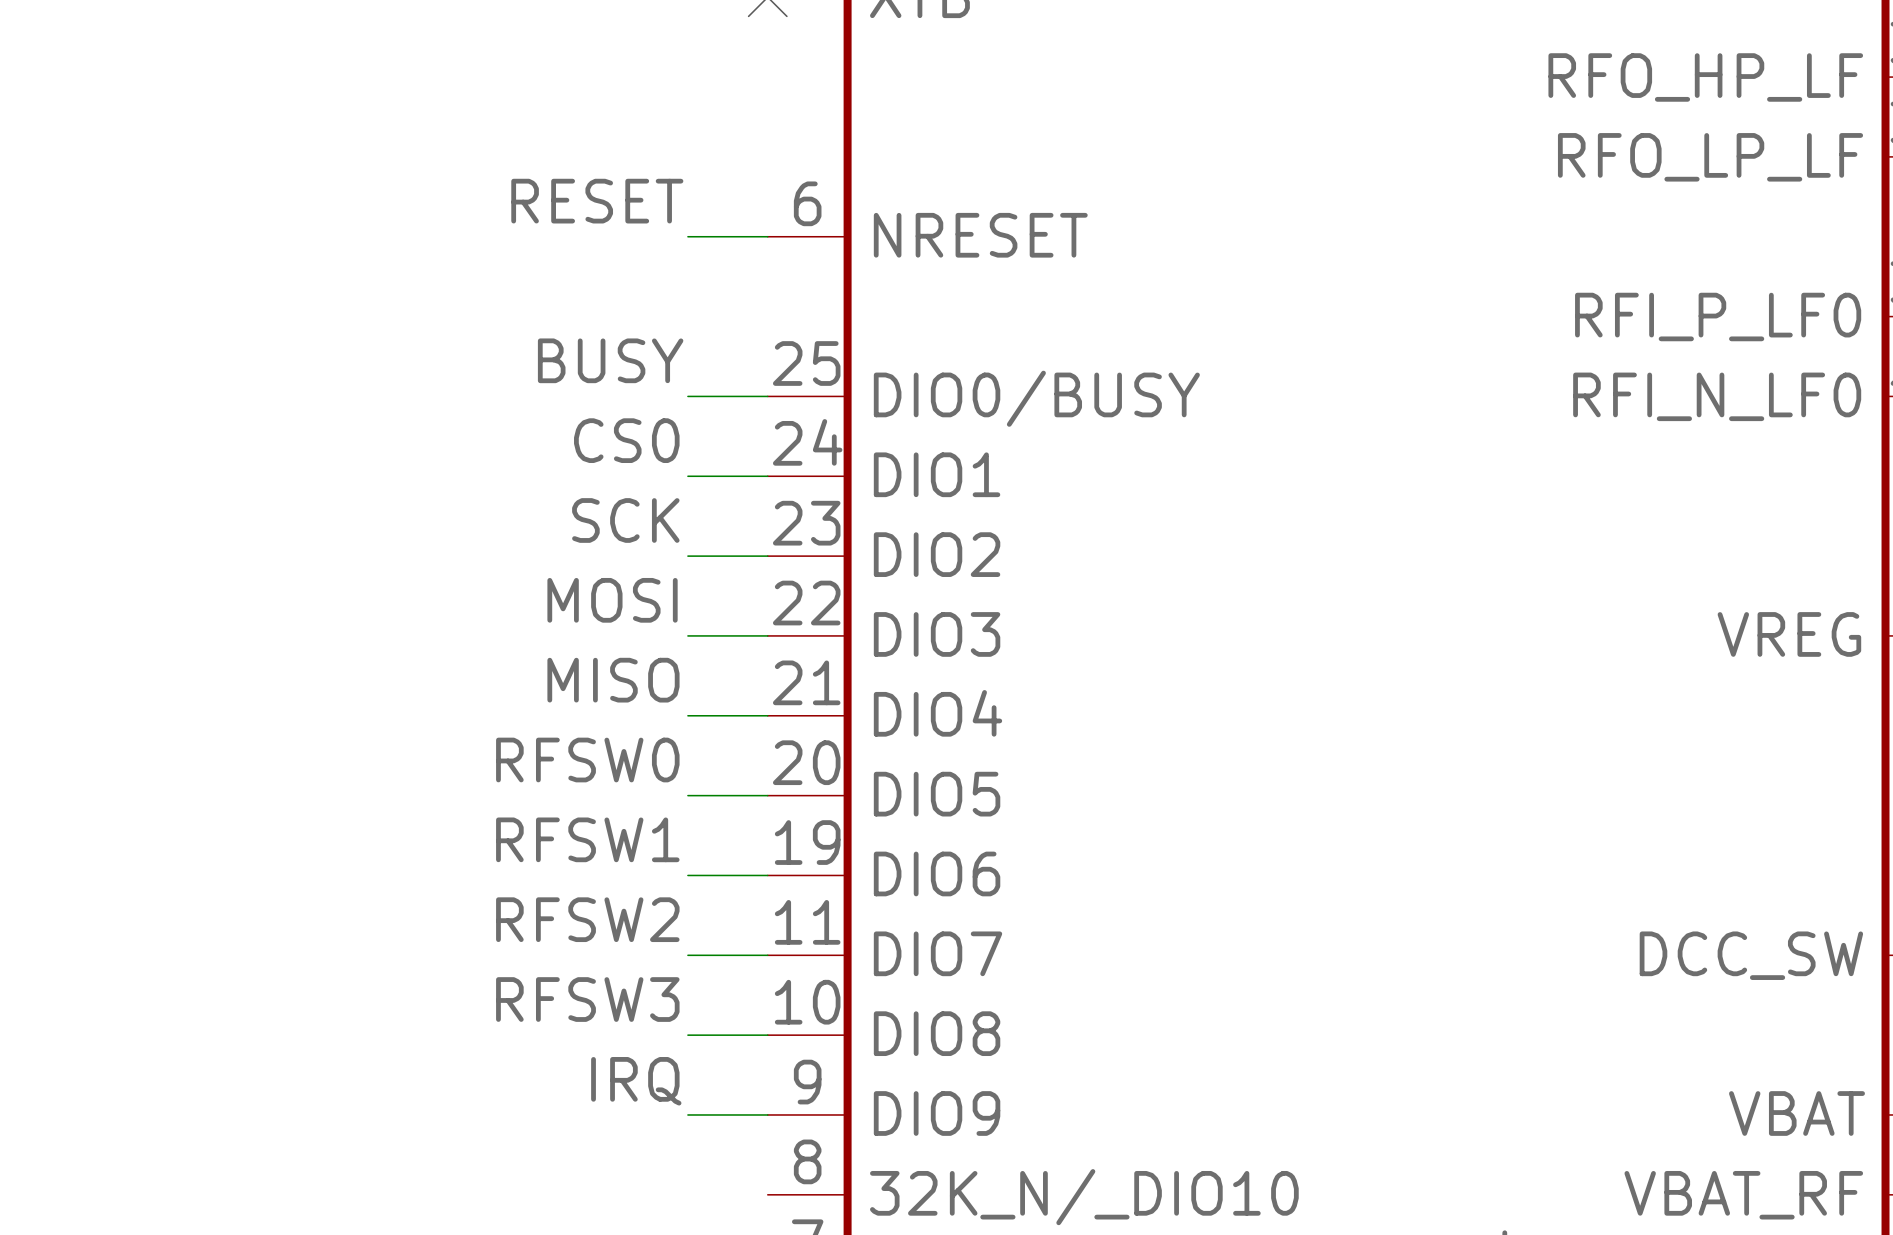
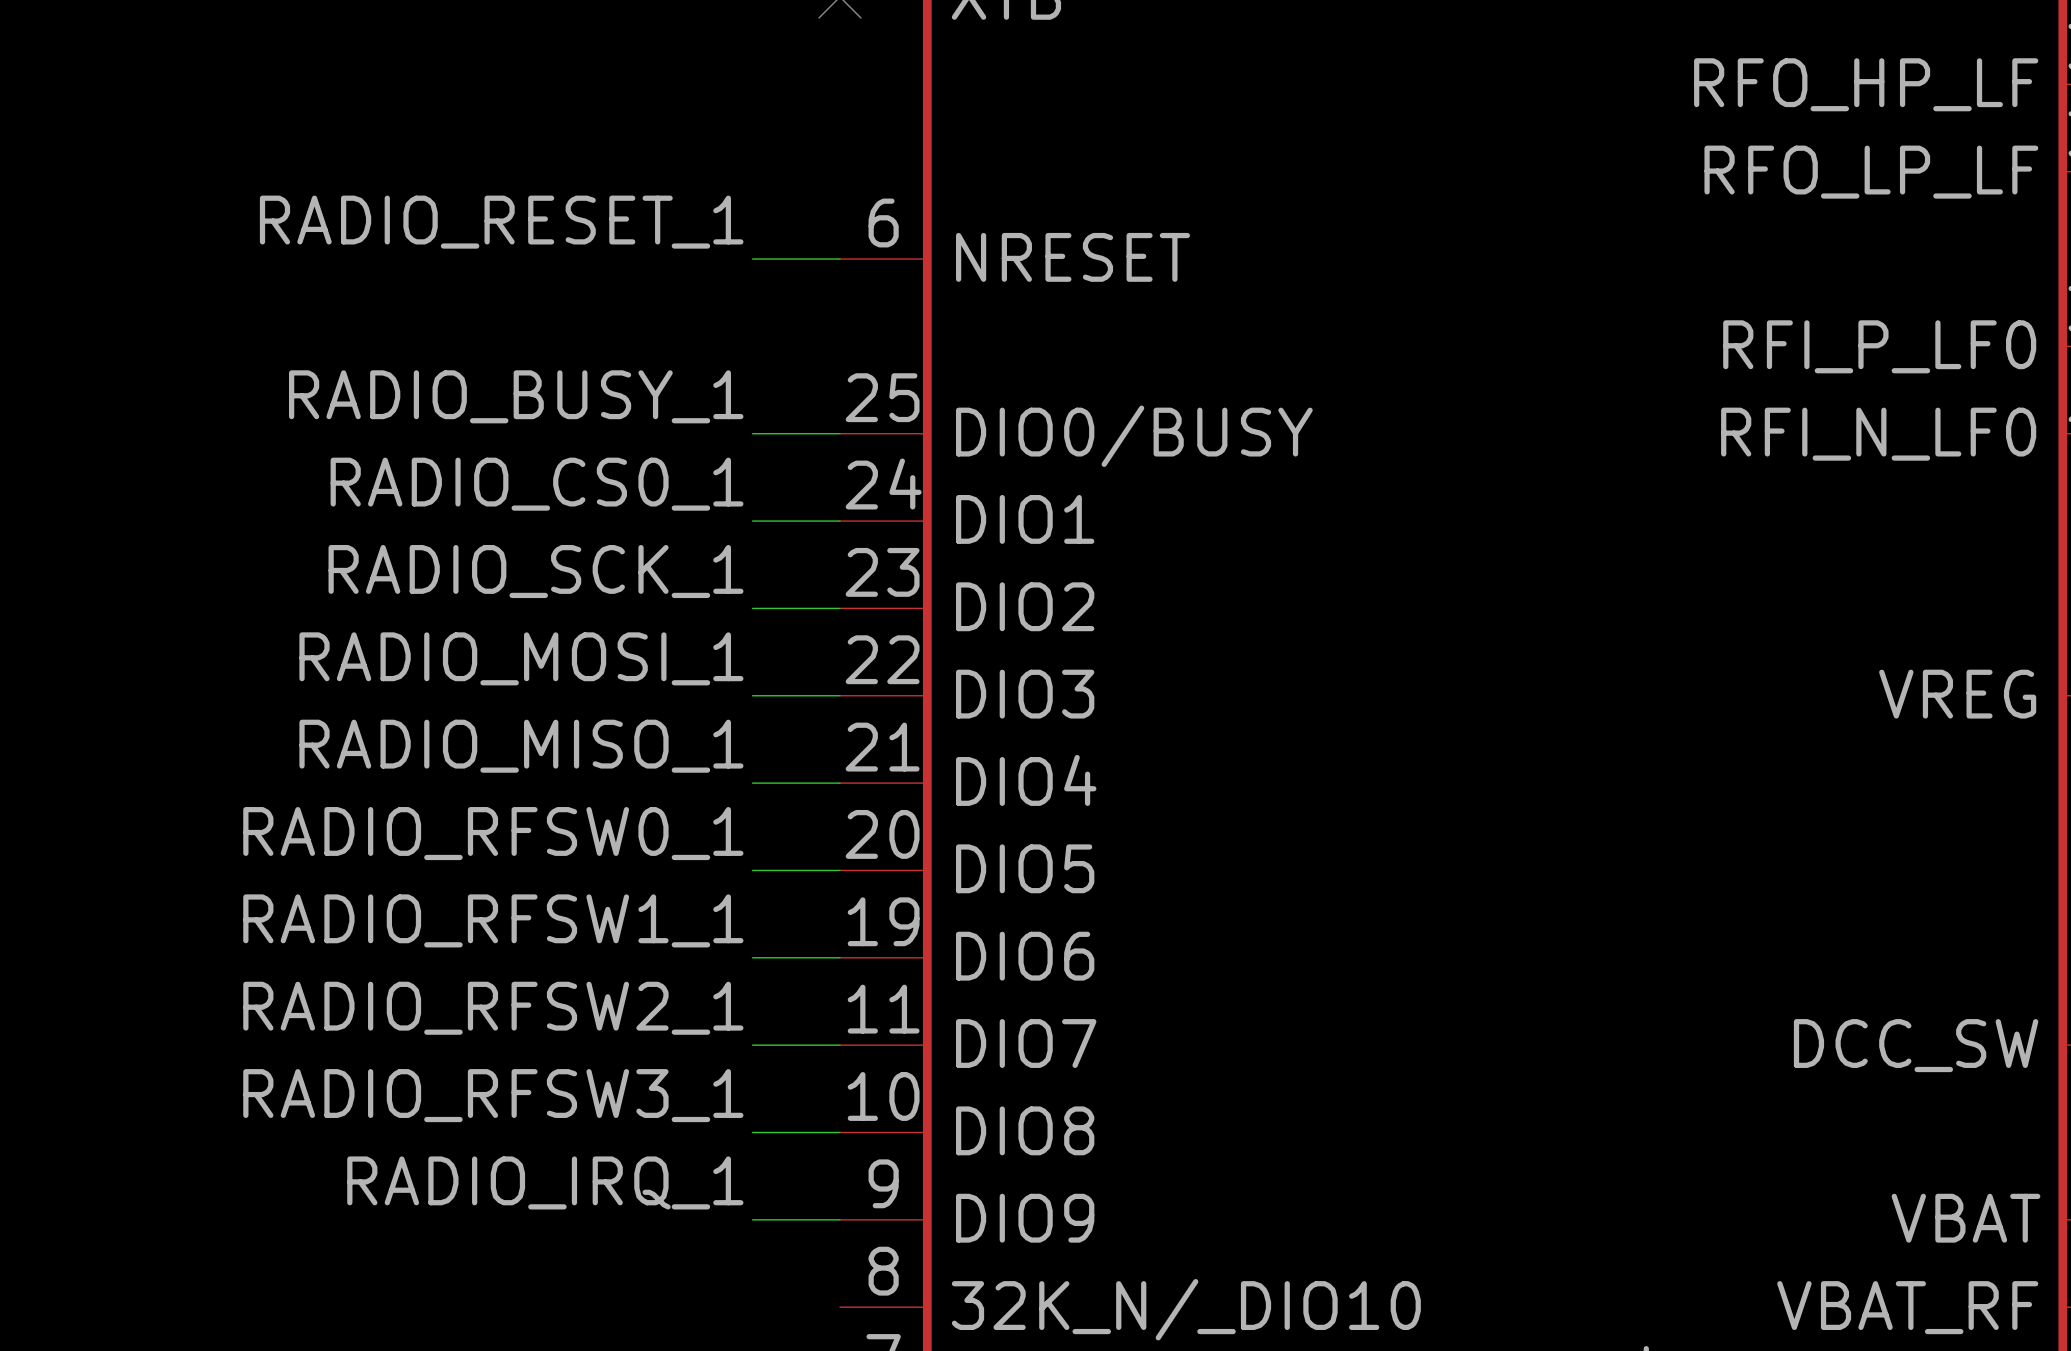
label: RESET (597, 201) -> RADIO_RESET_1 (501, 222)
label: BUSY (610, 360) -> RADIO_BUSY_1 (516, 396)
label: CS0 (626, 440) -> RADIO_CS0_1 (537, 484)
label: SCK (625, 520) -> RADIO_SCK_1 (535, 571)
label: MOSI (612, 600) -> RADIO_MOSI_1 (521, 658)
label: MISO (613, 680) -> RADIO_MISO_1 (521, 746)
label: RFSW0 (587, 760) -> RADIO_RFSW0_1 (493, 833)
label: RFSW1 (587, 839) -> RADIO_RFSW1_1 (493, 920)
label: RFSW2 (587, 919) -> RADIO_RFSW2_1 (493, 1008)
label: RFSW3 (587, 999) -> RADIO_RFSW3_1 (493, 1095)
label: IRQ (636, 1081) -> RADIO_IRQ_1 (545, 1182)

